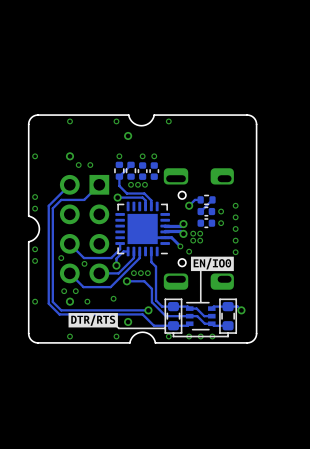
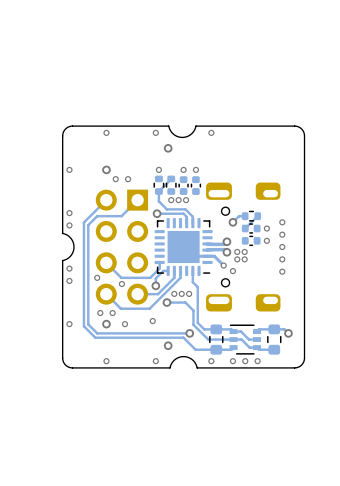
drawing: [190, 256, 234, 272] -> none
line: (200, 270) (200, 302) -> none
line: (181, 299) (165, 299) (165, 333) (181, 333) (181, 299) -> none
line: (236, 299) (236, 333) (219, 333) (219, 299) (236, 299) -> none
drawing: [68, 313, 118, 328] -> none
line: (116, 326) (118, 328) (165, 328) -> none
line: (228, 333) (228, 336) (173, 336) (173, 333) -> none

